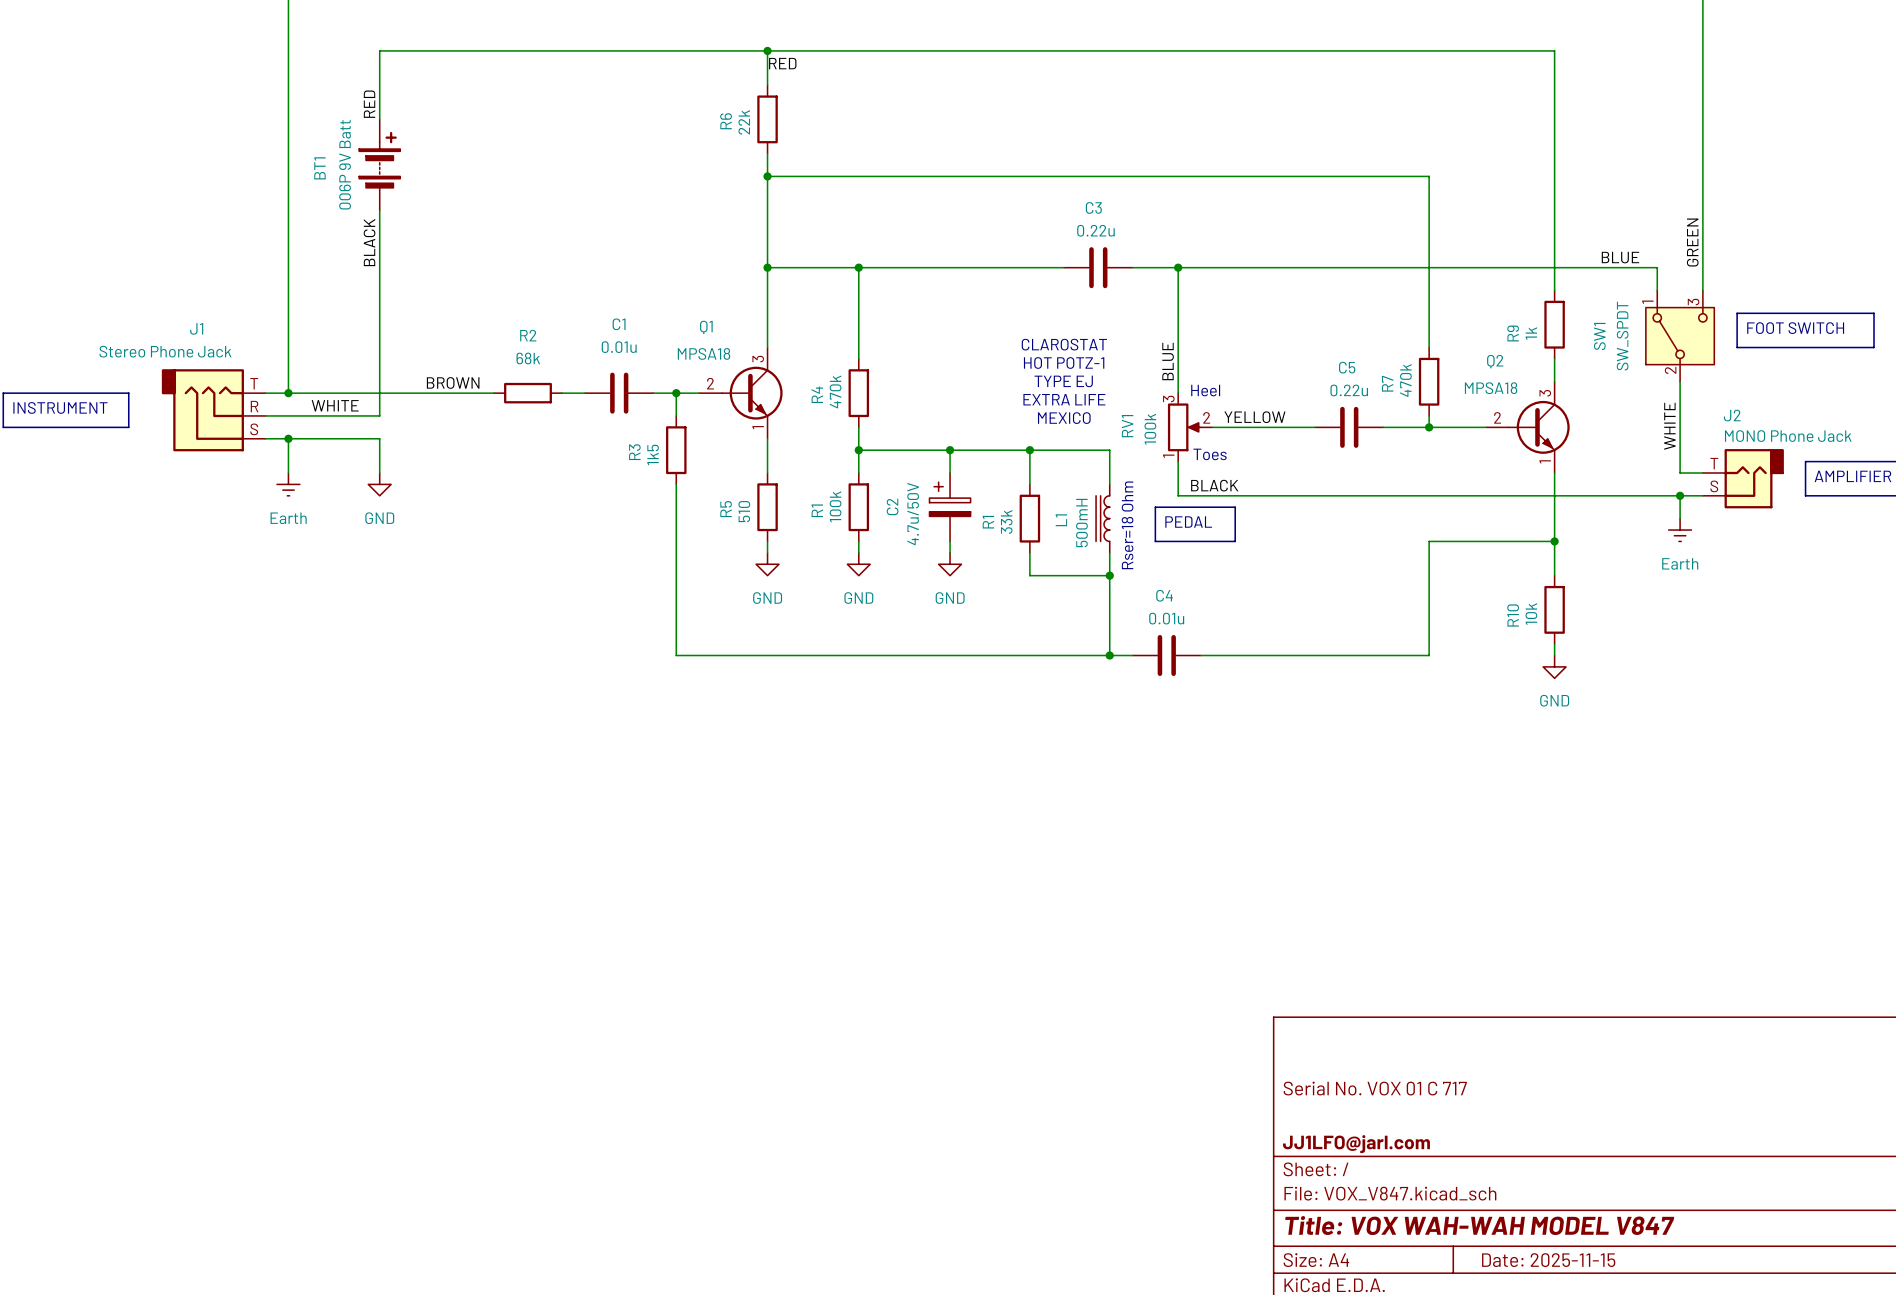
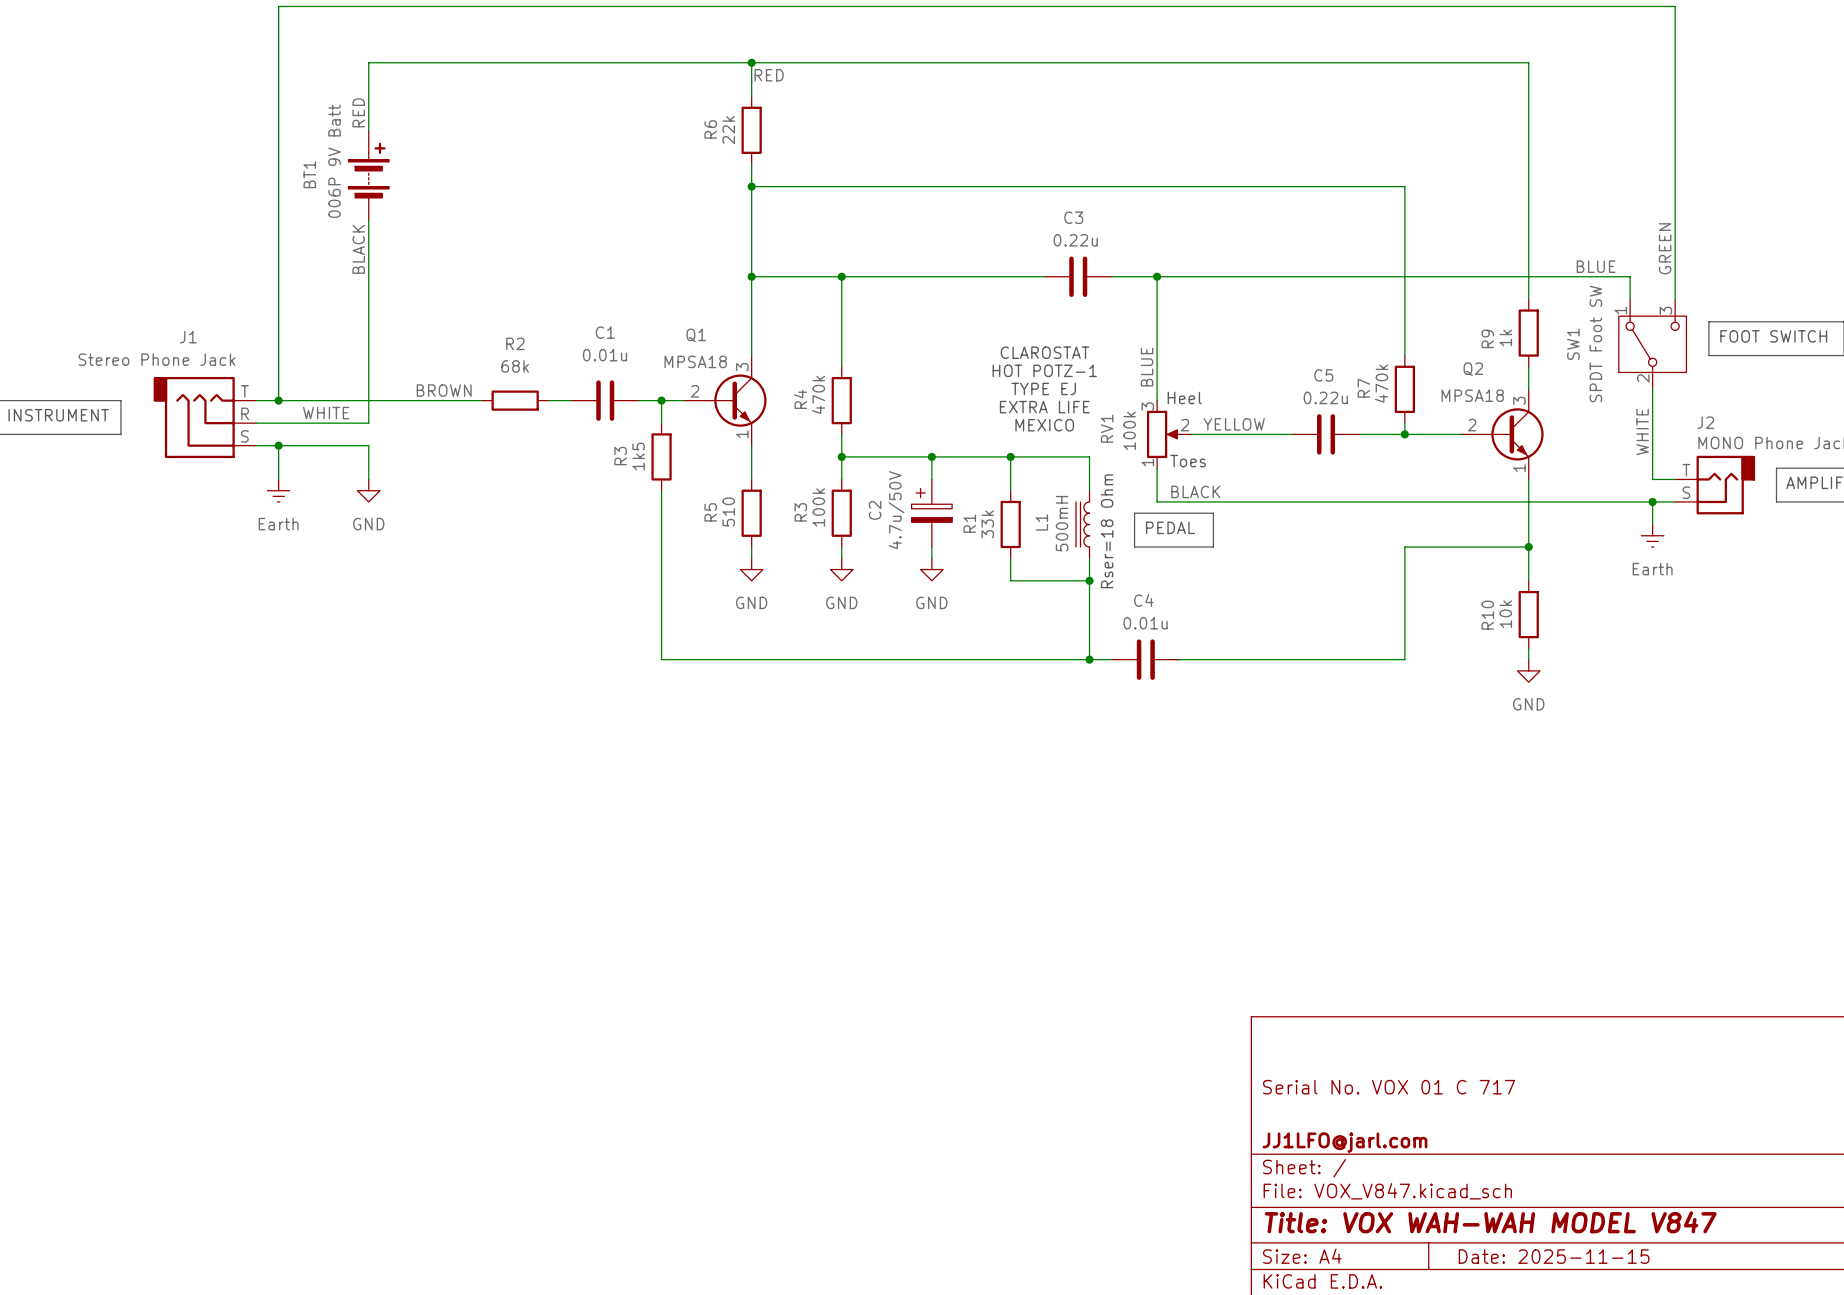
SW1 value: SW_SPDT (1622, 336) -> SPDT Foot SW (1595, 344)
R1 name: R1 (817, 510) -> R3 (800, 512)

